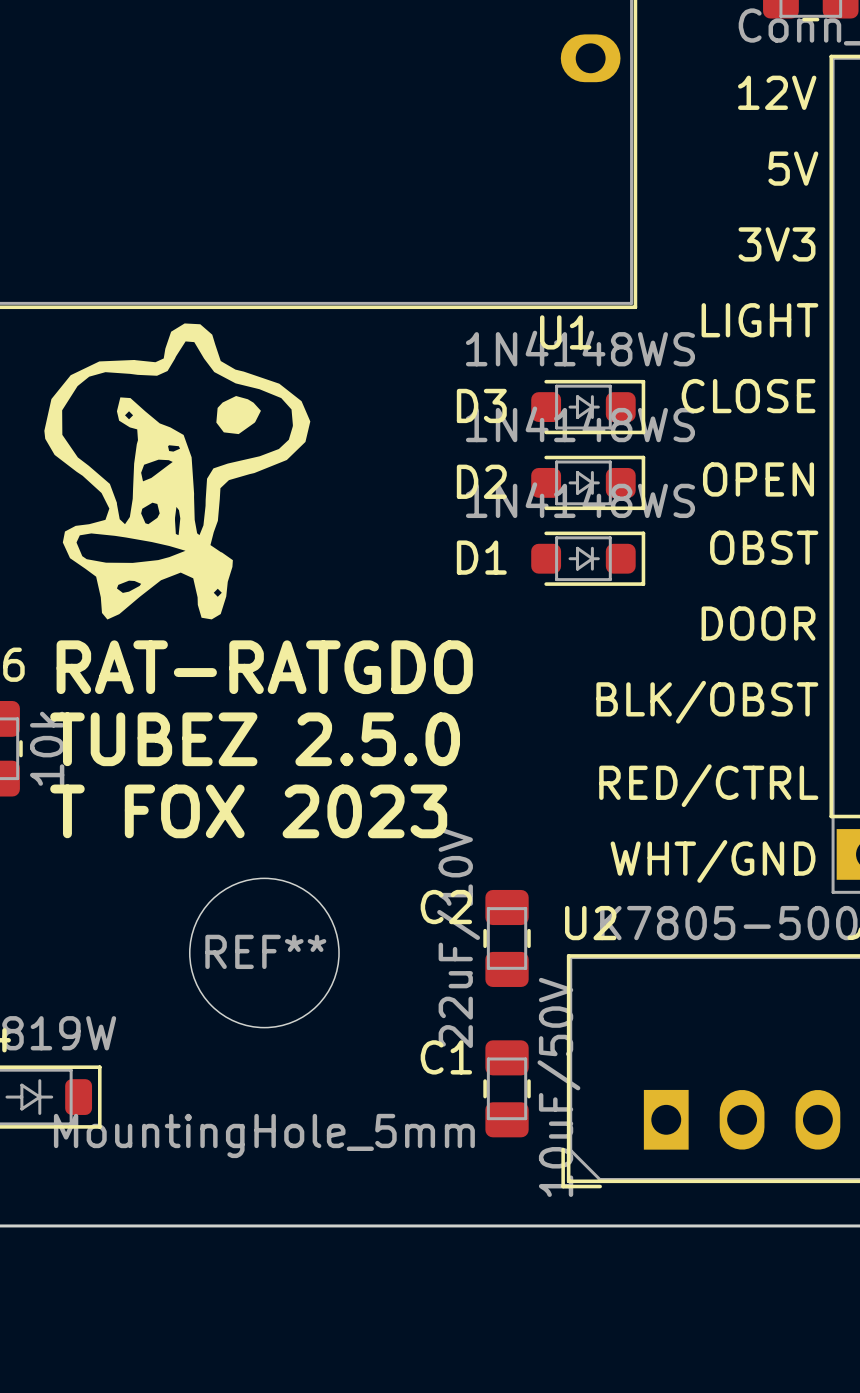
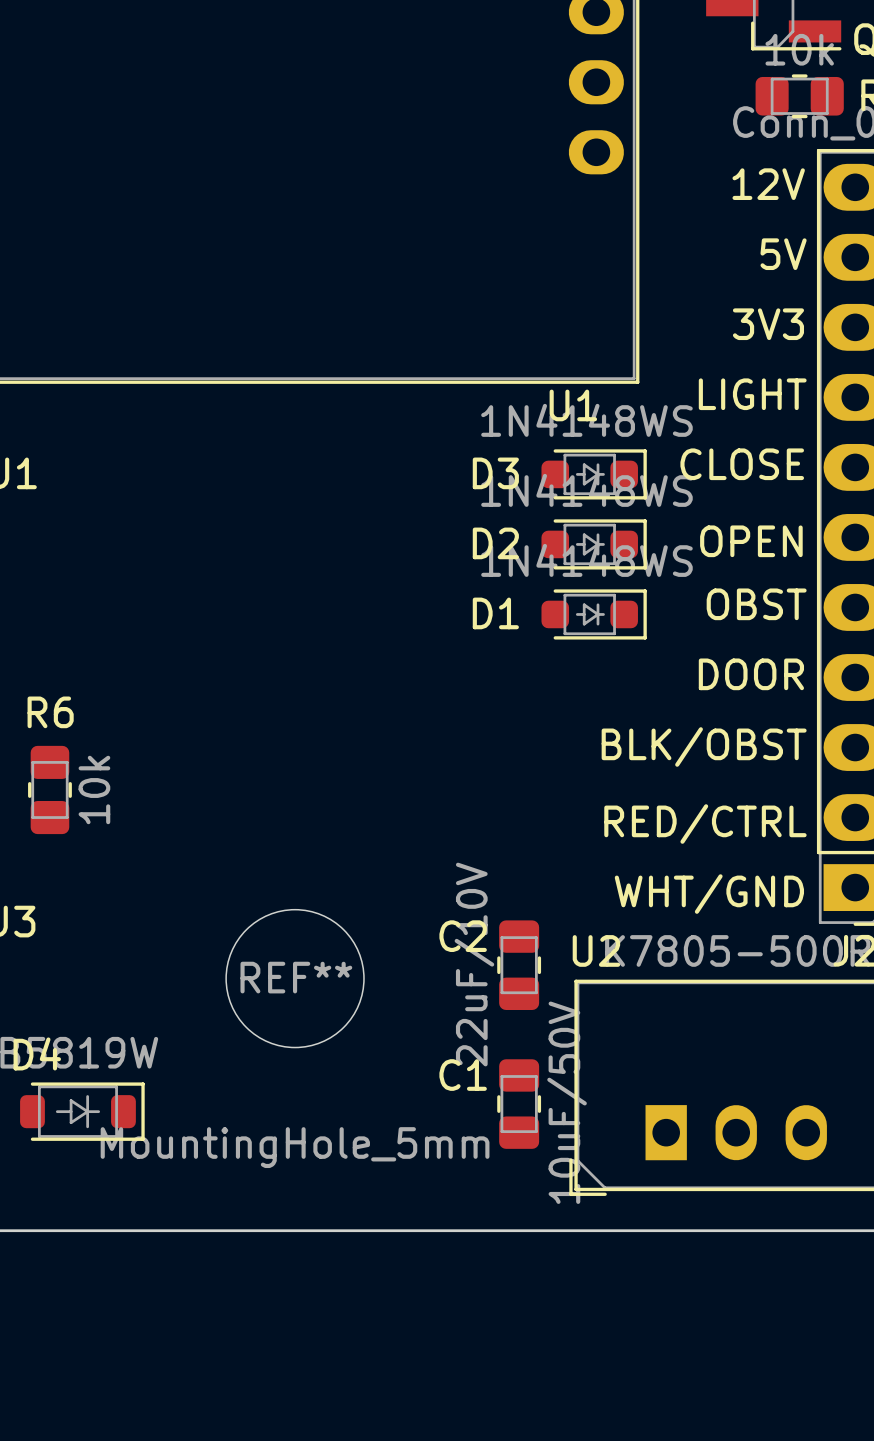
drawing: [44, 323, 311, 620] -> none
text: RAT-RATGDO (264, 667) -> none
text: TUBEZ 2.5.0 (255, 739) -> none
text: T FOX 2023 (248, 811) -> none

